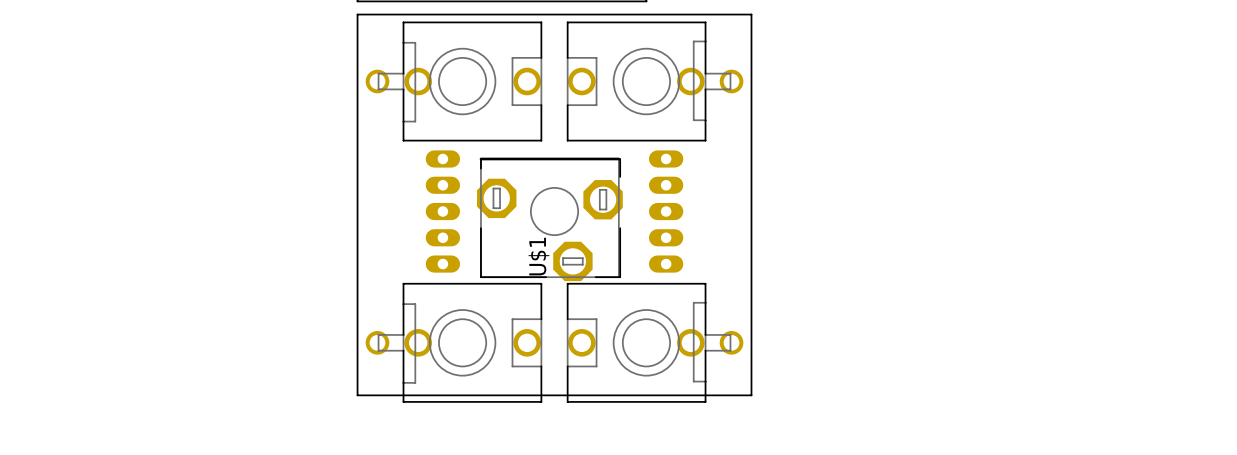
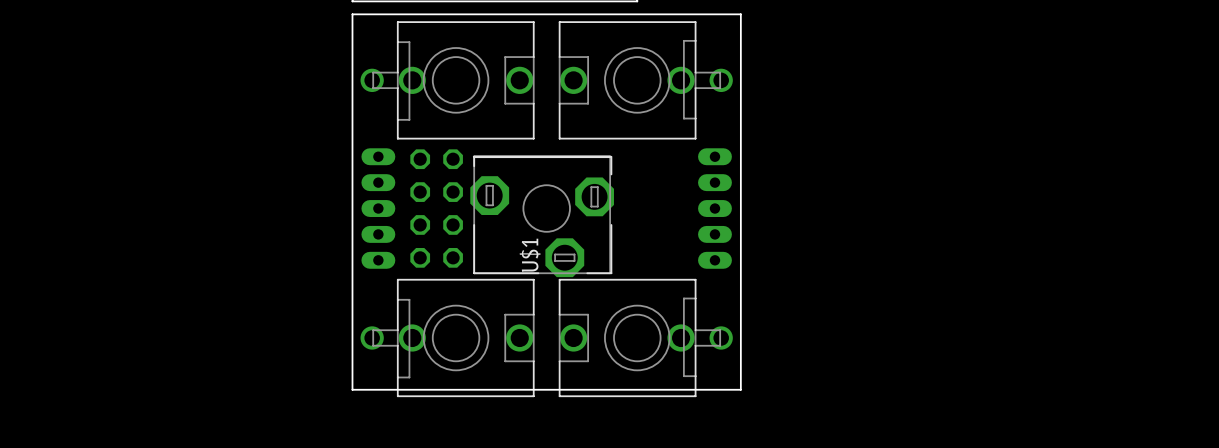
part footprint: [425, 150, 461, 273] -> [410, 149, 463, 268]
part: none -> (378, 208)
part position: (666, 211) -> (714, 208)

